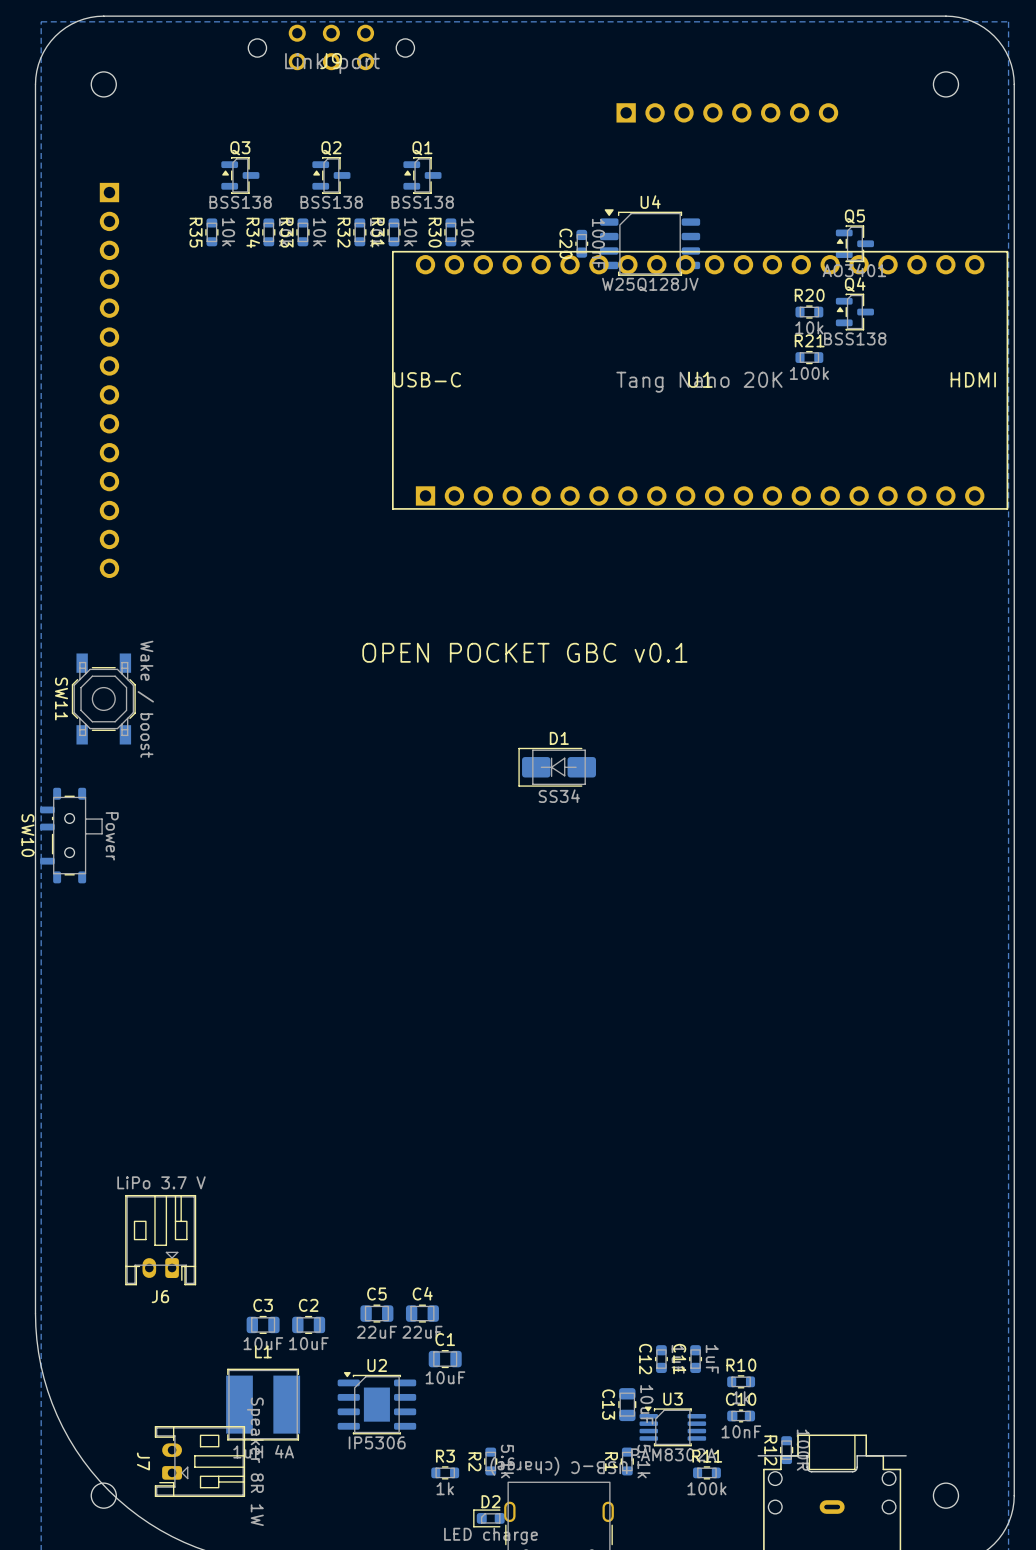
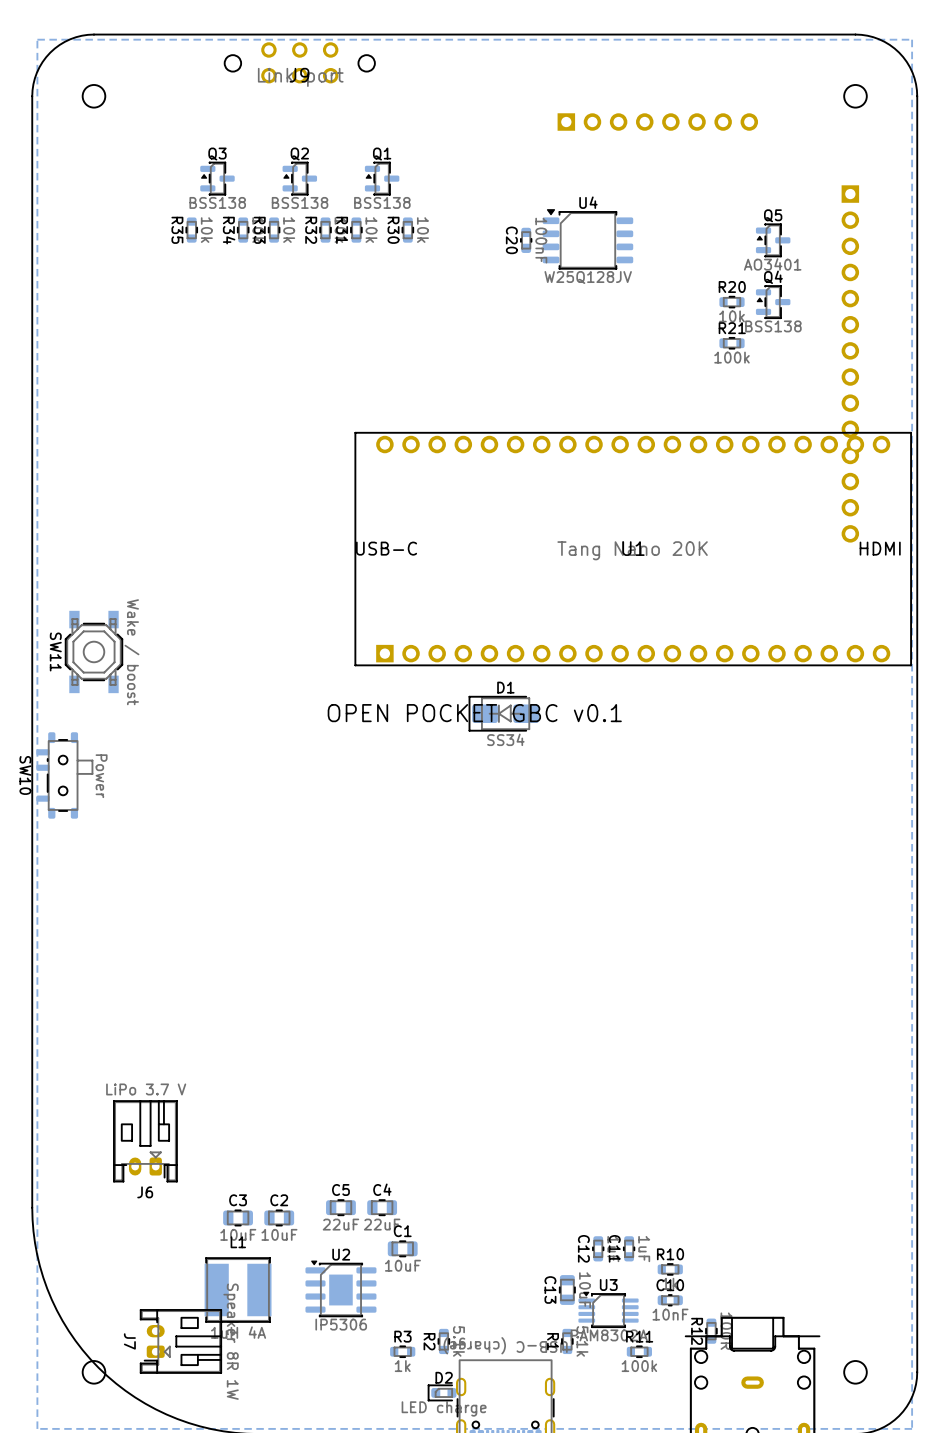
part: (109, 380) -> none
U1 position: (700, 380) -> (633, 549)
part: none -> (850, 363)
text position: OPEN POCKET GBC v0.1 (524, 652) -> OPEN POCKET GBC v0.1 (474, 713)

